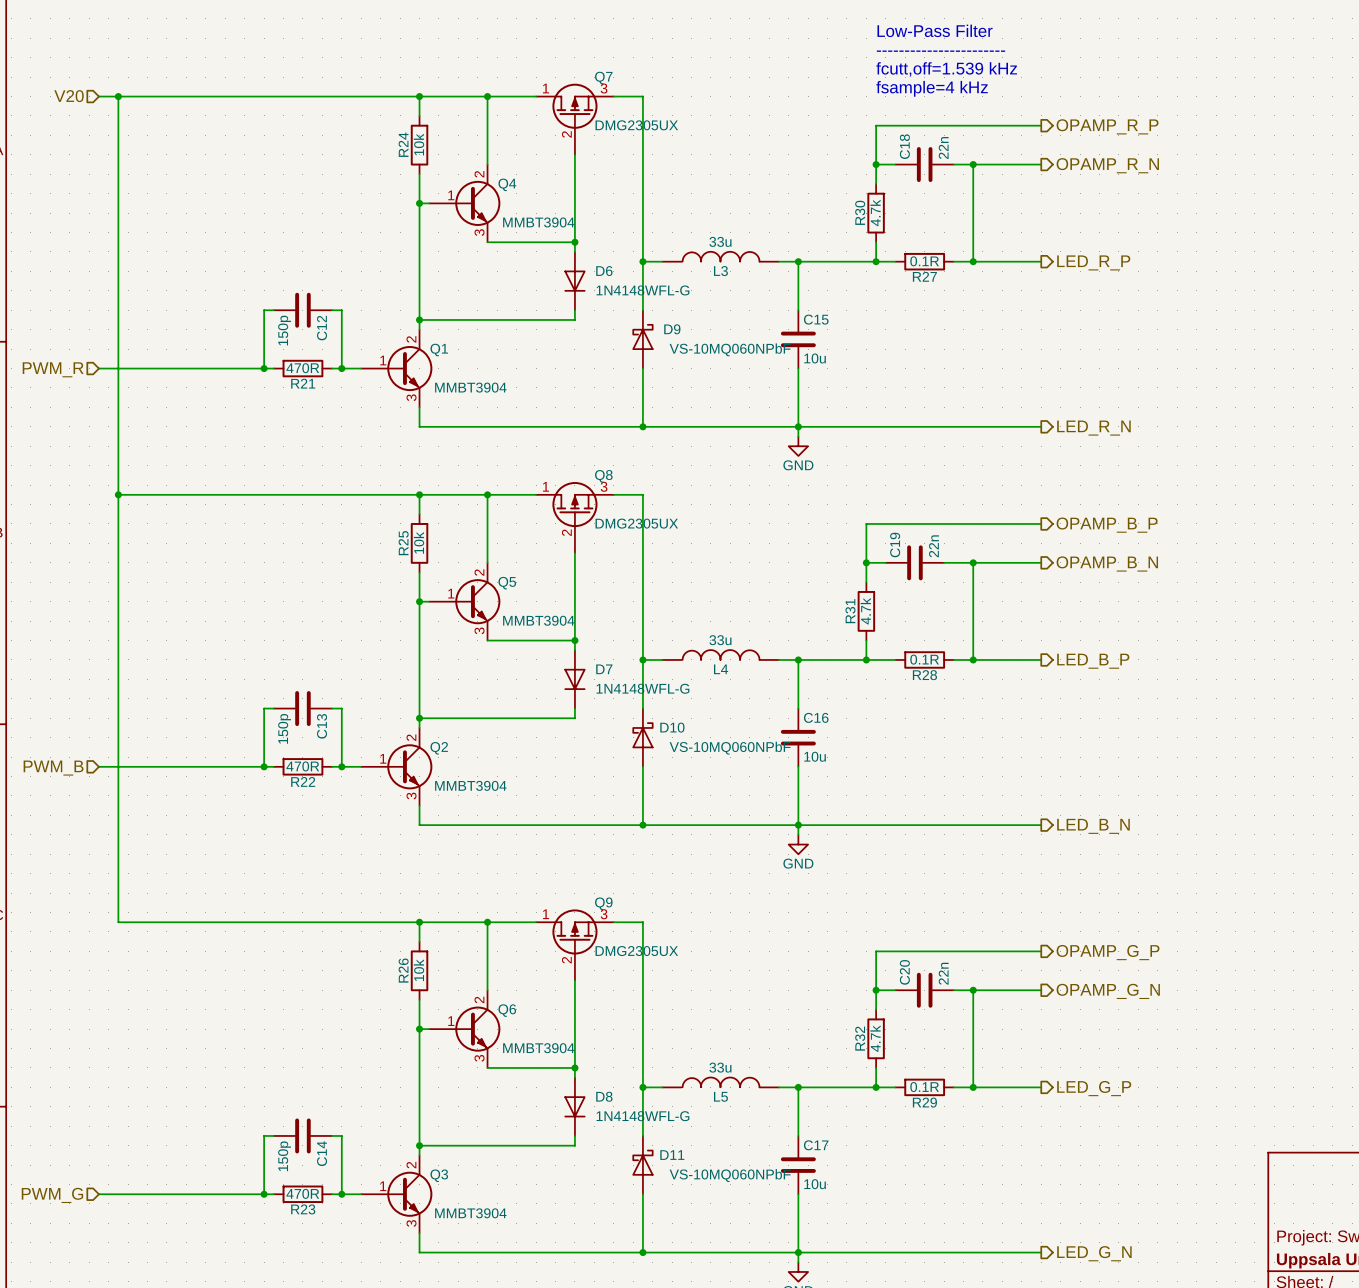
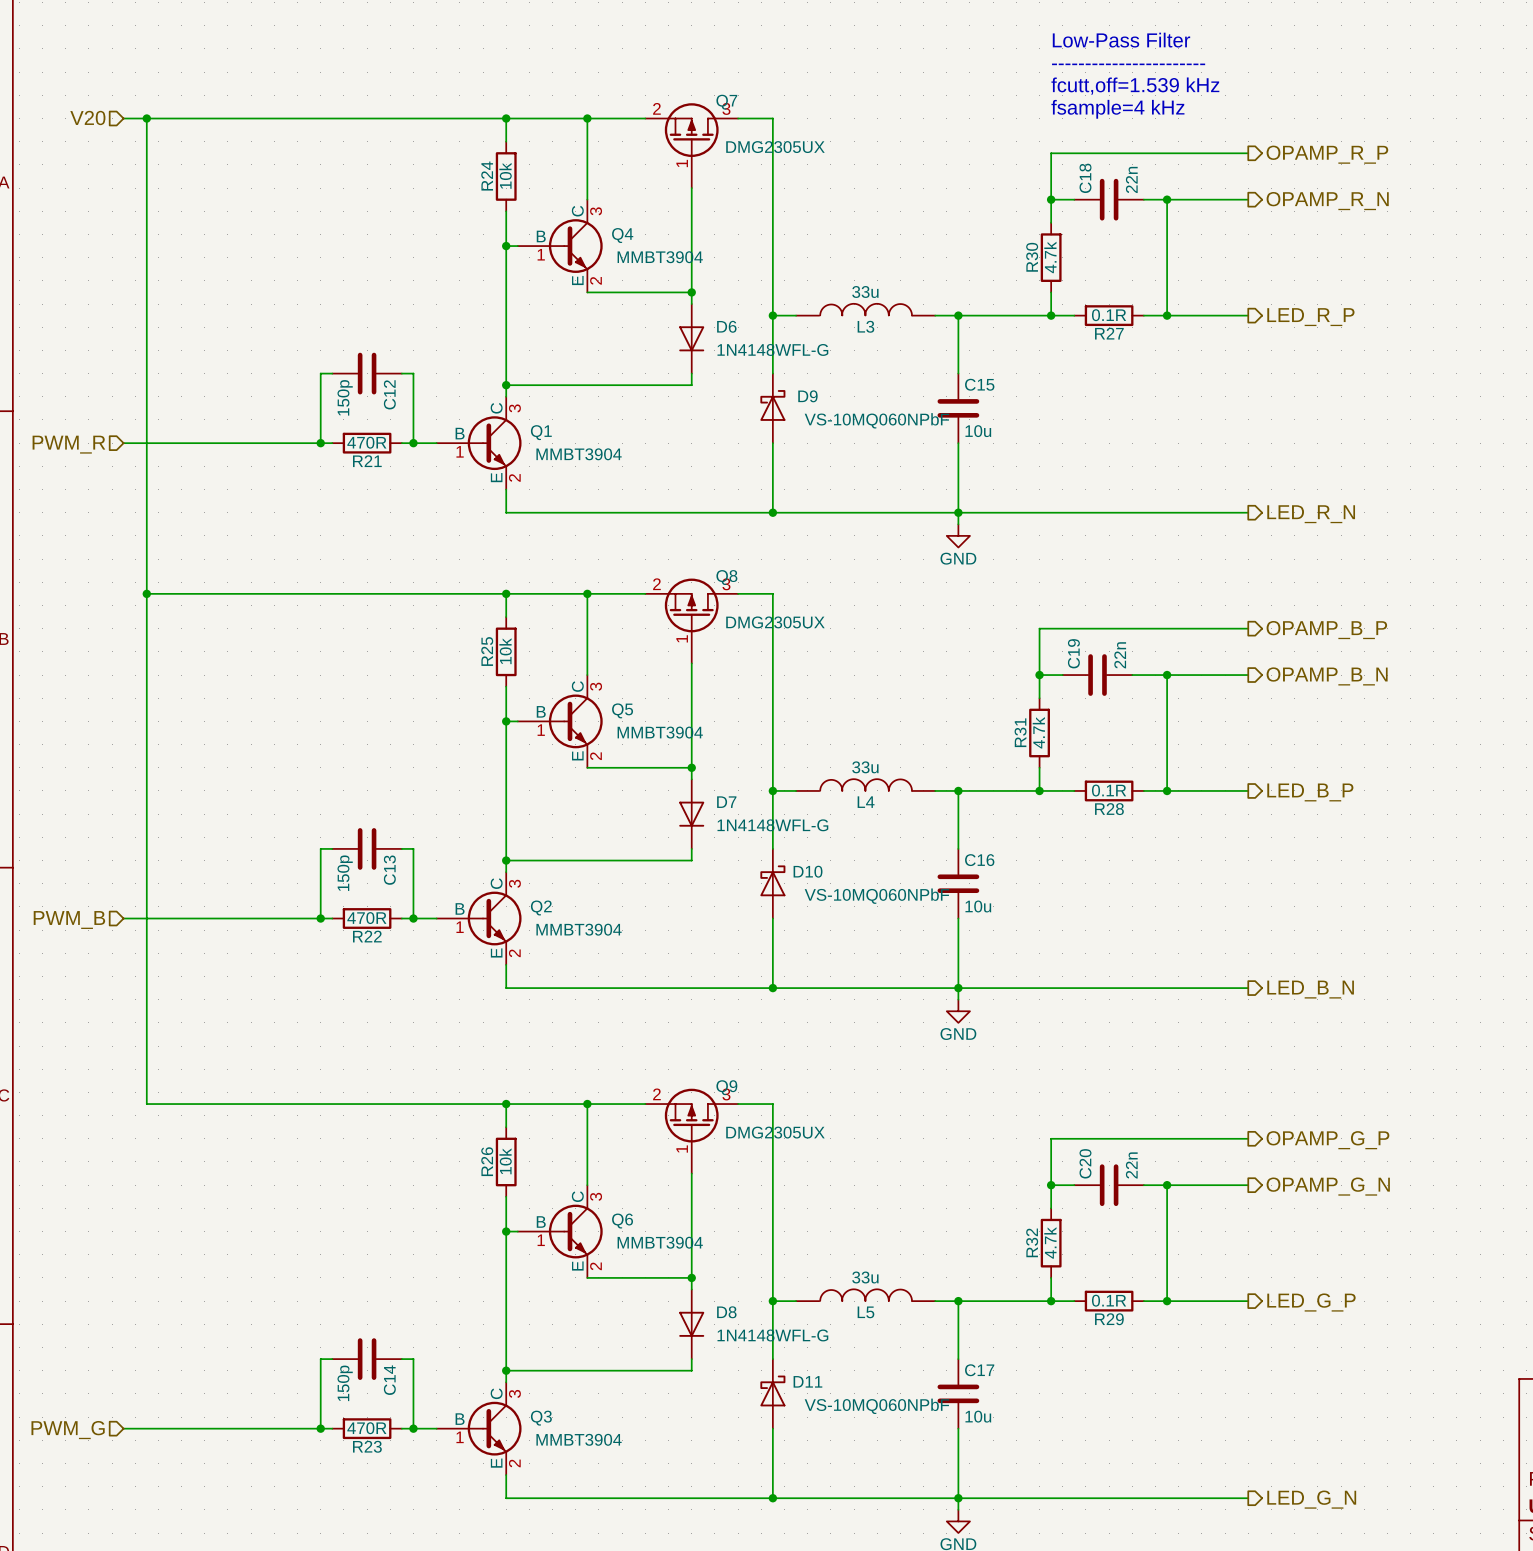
Q7 symbol: [536, 83, 614, 155] -> [645, 103, 739, 189]
Q4 symbol: [429, 164, 501, 243] -> [517, 199, 603, 293]
Q1 symbol: [361, 329, 433, 408] -> [436, 396, 522, 490]
Q8 symbol: [536, 482, 614, 554] -> [645, 578, 739, 664]
Q5 symbol: [429, 562, 501, 641] -> [517, 675, 603, 768]
Q2 symbol: [361, 727, 433, 806] -> [436, 872, 522, 965]
Q9 symbol: [536, 909, 614, 981] -> [645, 1088, 739, 1174]
Q6 symbol: [429, 990, 501, 1068] -> [517, 1185, 603, 1278]
Q3 symbol: [361, 1155, 433, 1234] -> [436, 1382, 522, 1476]

